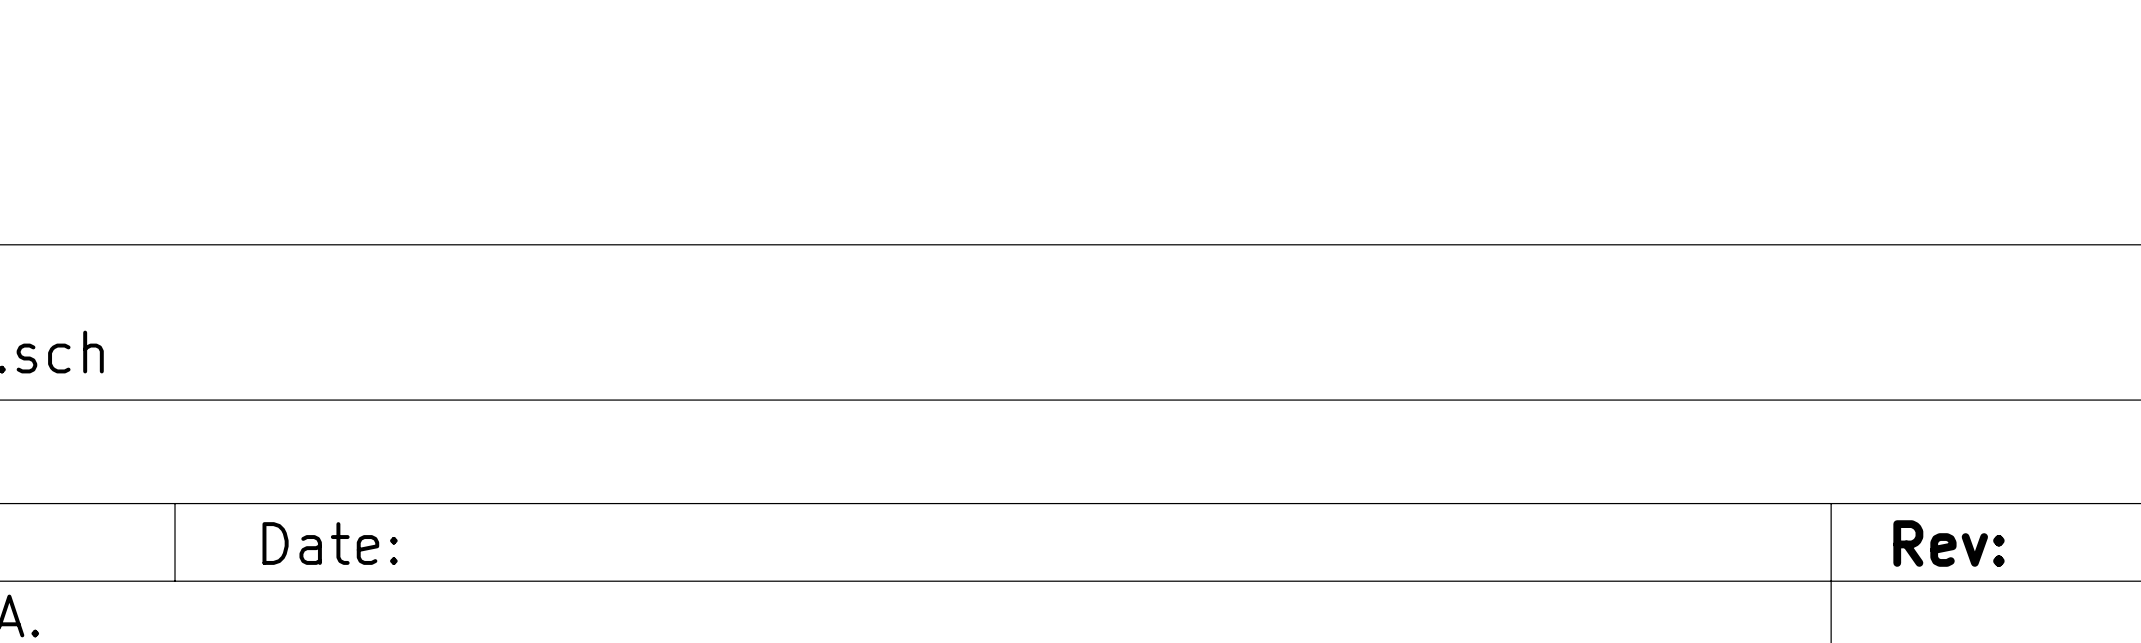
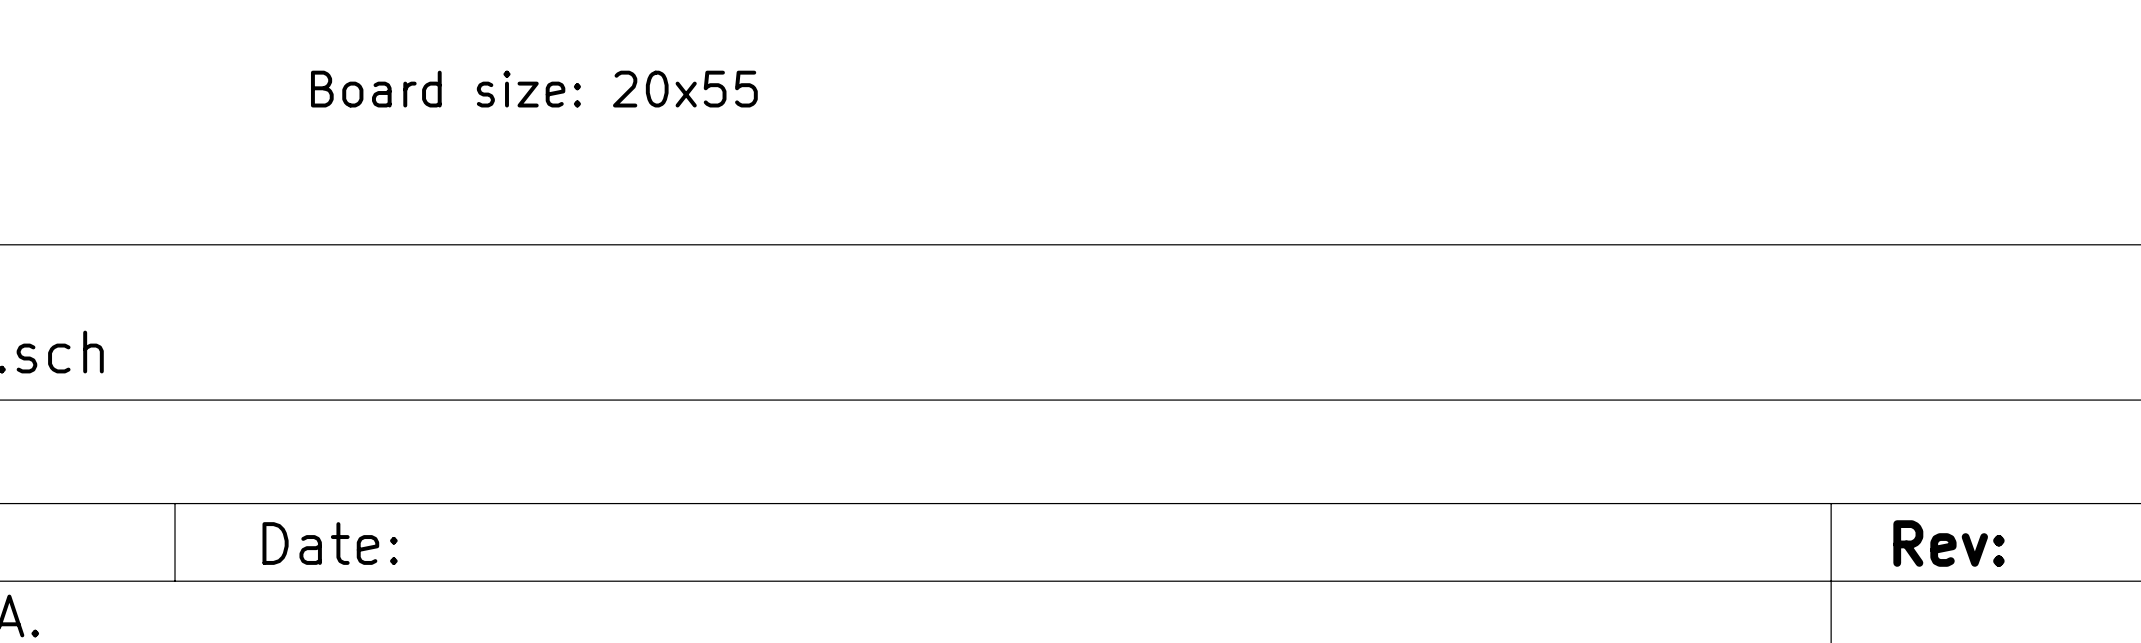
text: none -> Board size: 20x55 (534, 89)

